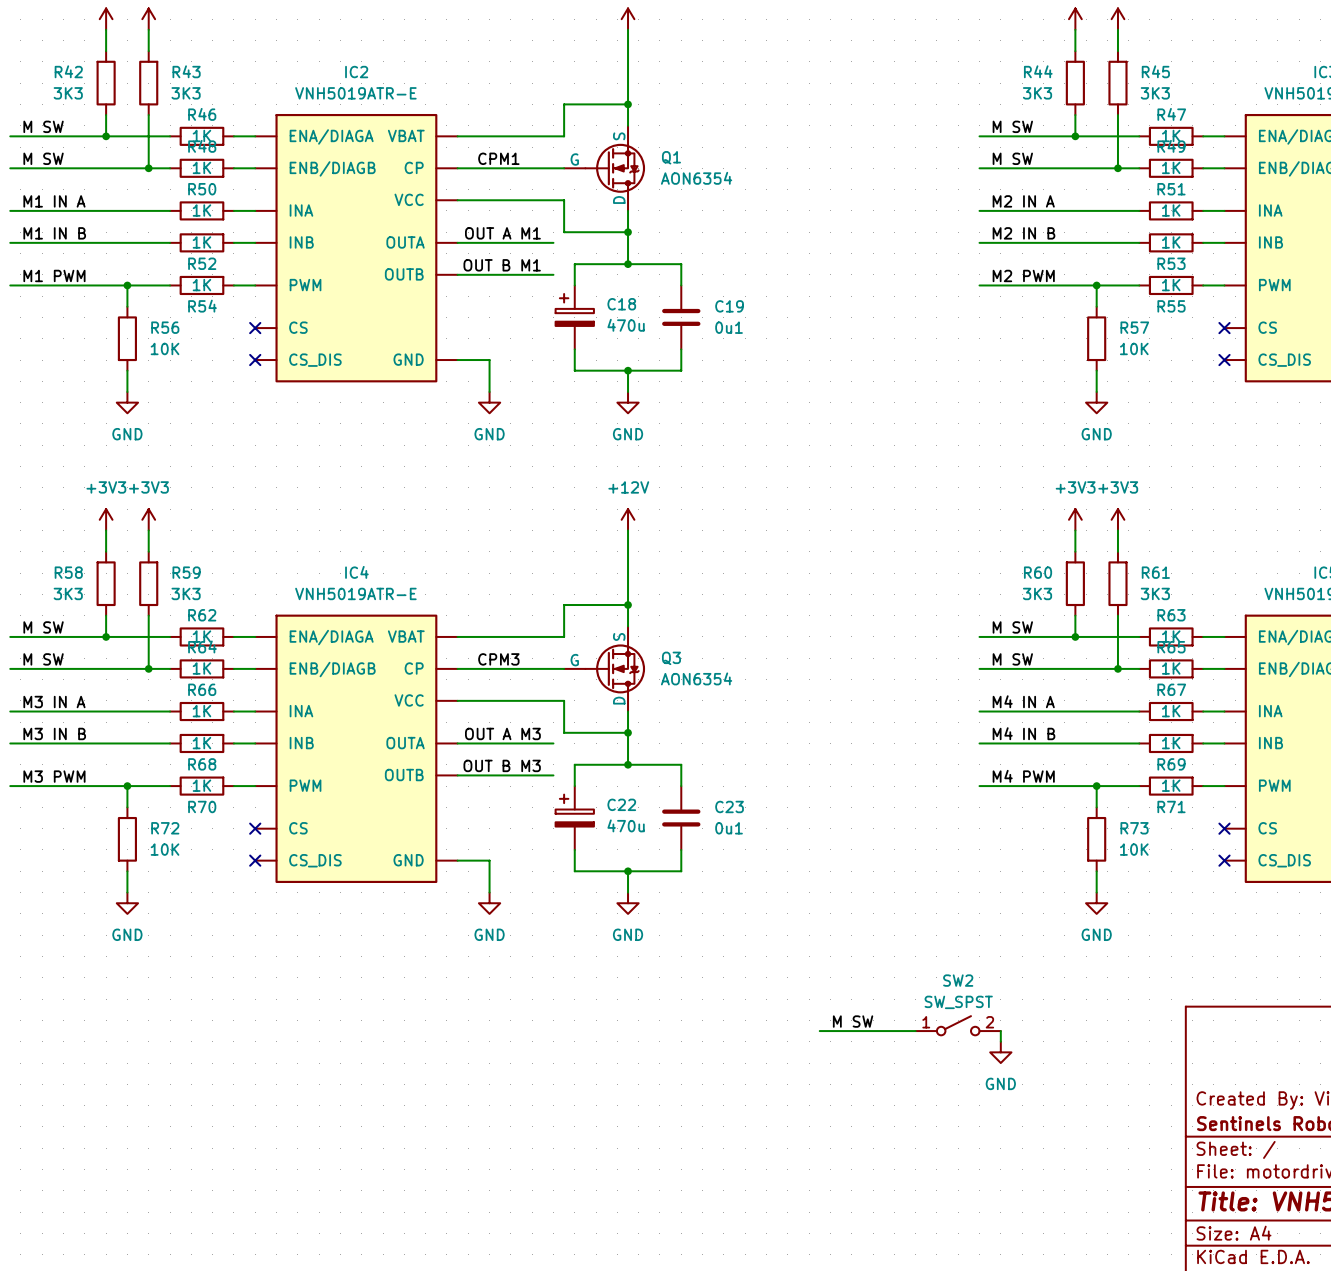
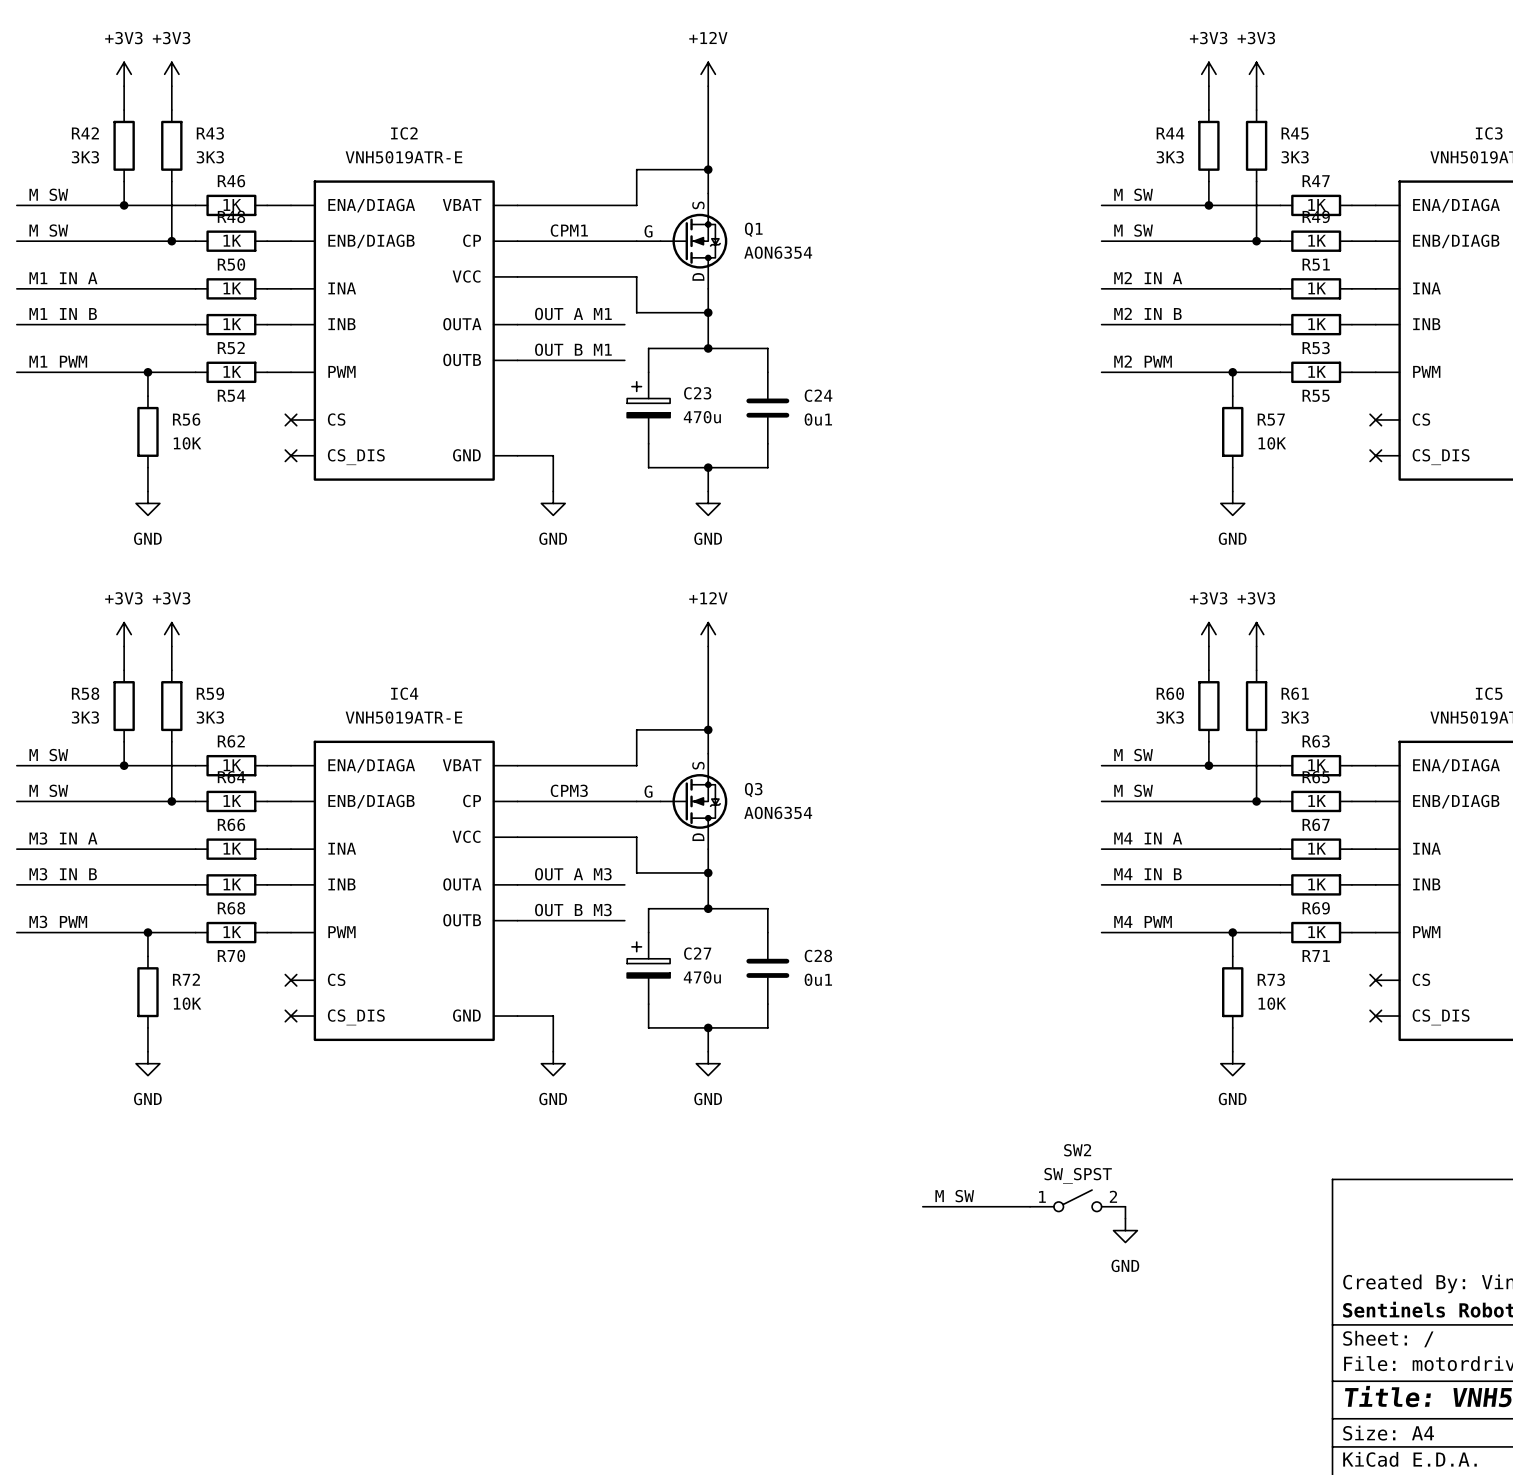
C18 name: C18 (621, 304) -> C23 (697, 393)
C19 name: C19 (729, 306) -> C24 (818, 395)
C22 name: C22 (621, 804) -> C27 (697, 953)
C23 name: C23 (729, 806) -> C28 (818, 955)

